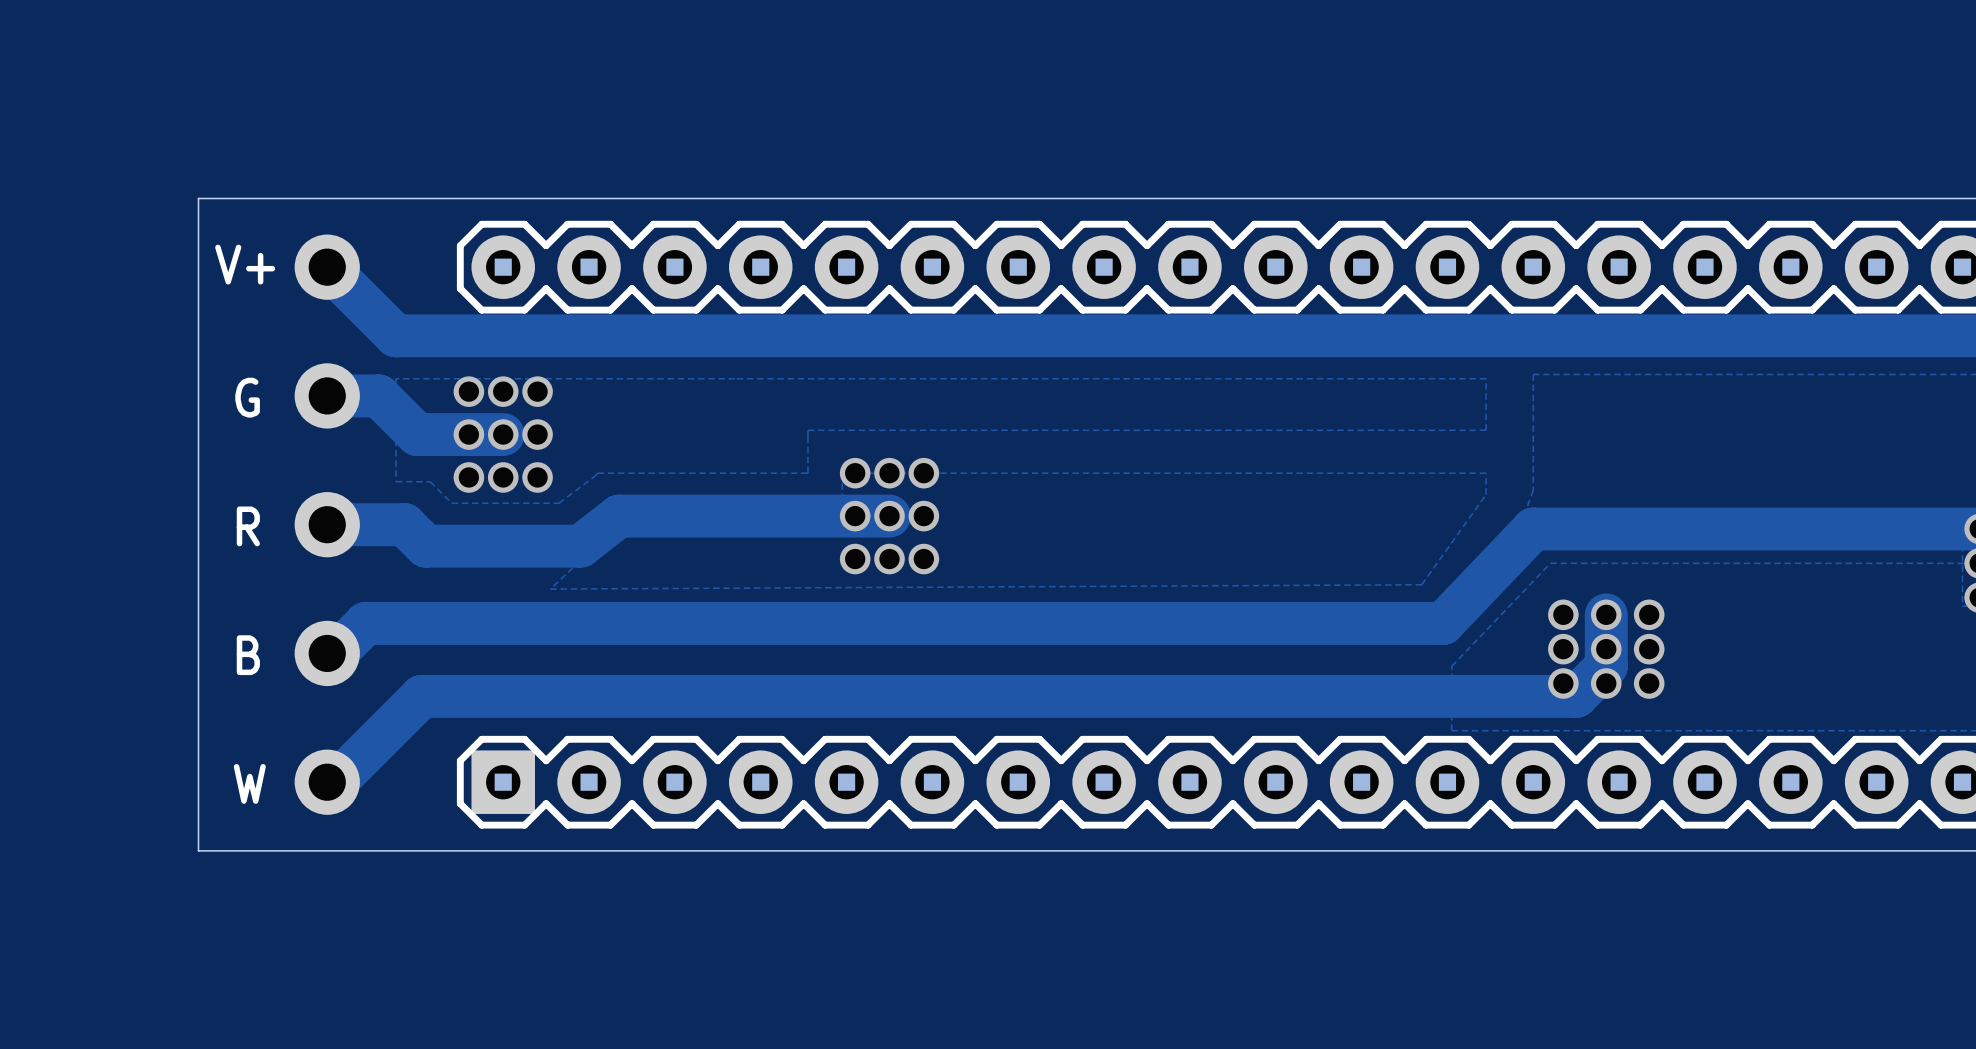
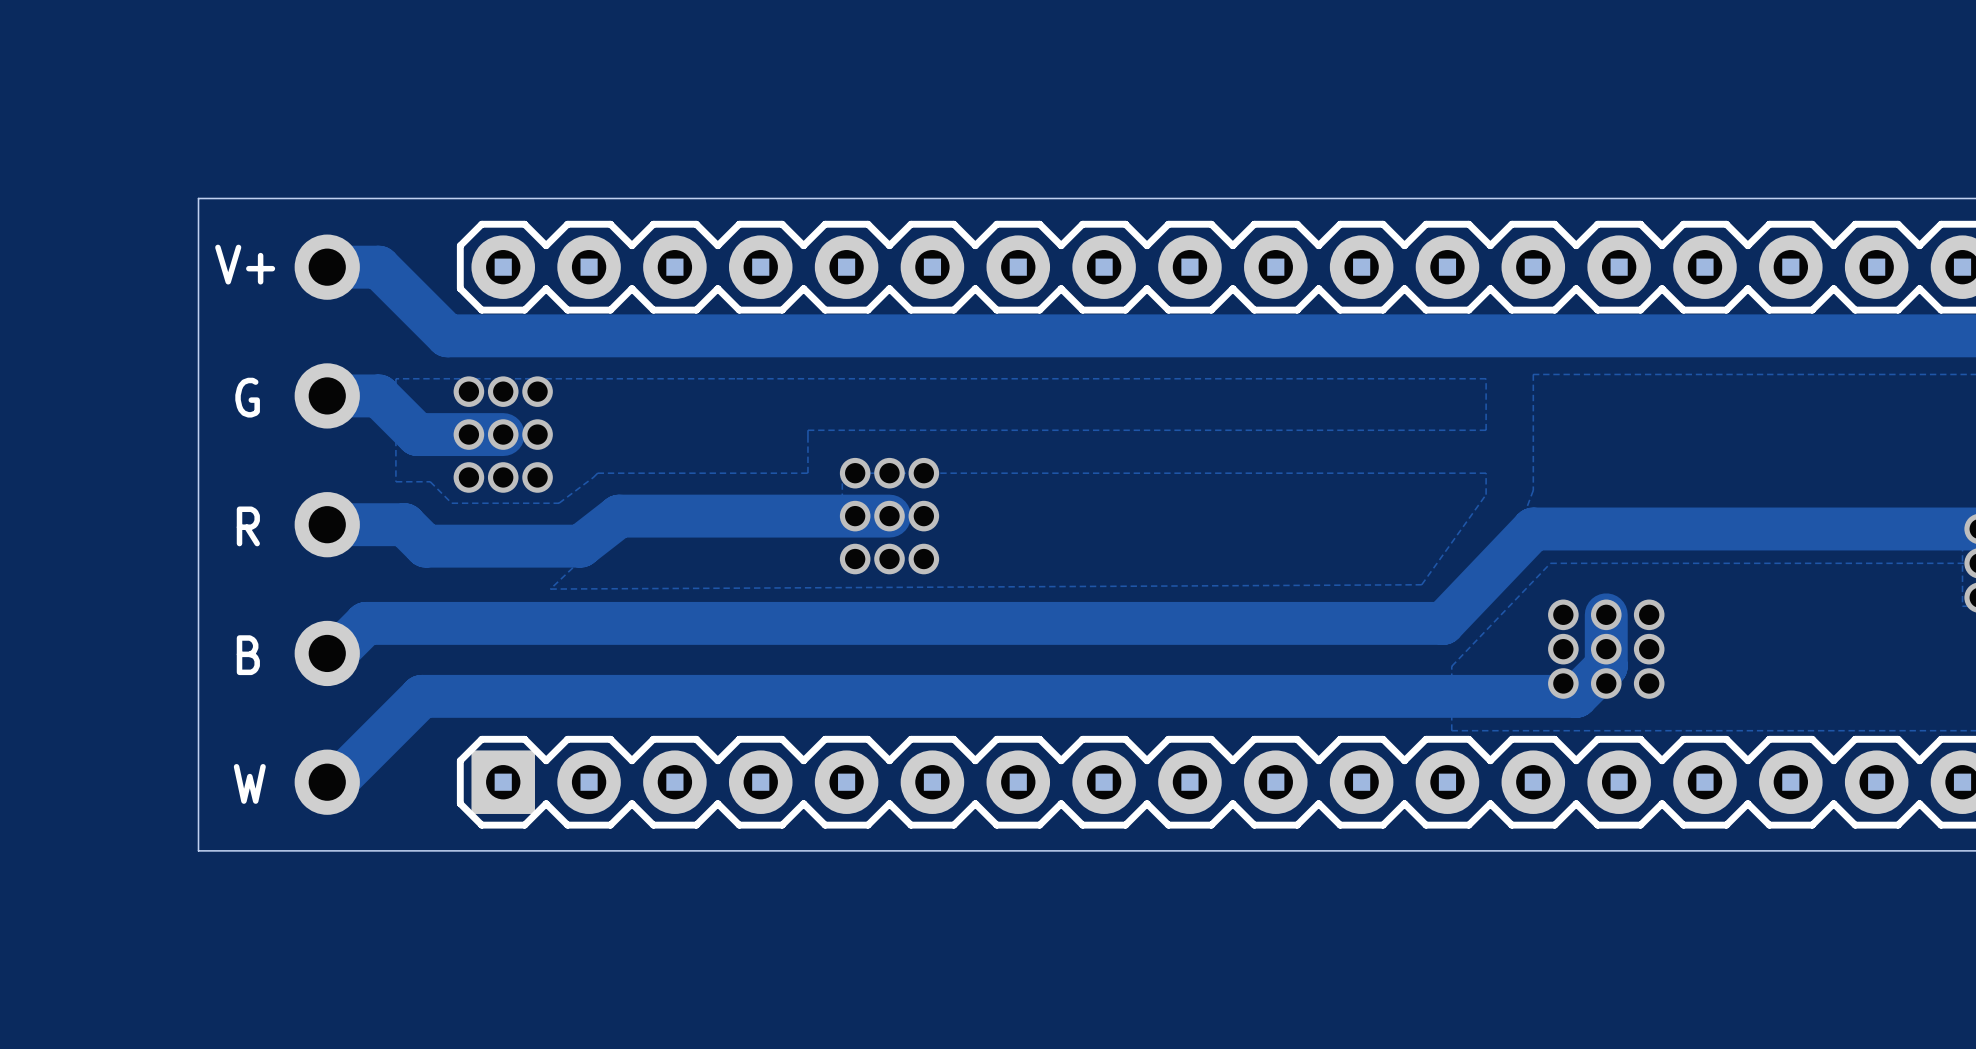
track: (327, 267) (395, 335) (447, 335) -> (327, 267) (378, 267) (447, 335)

